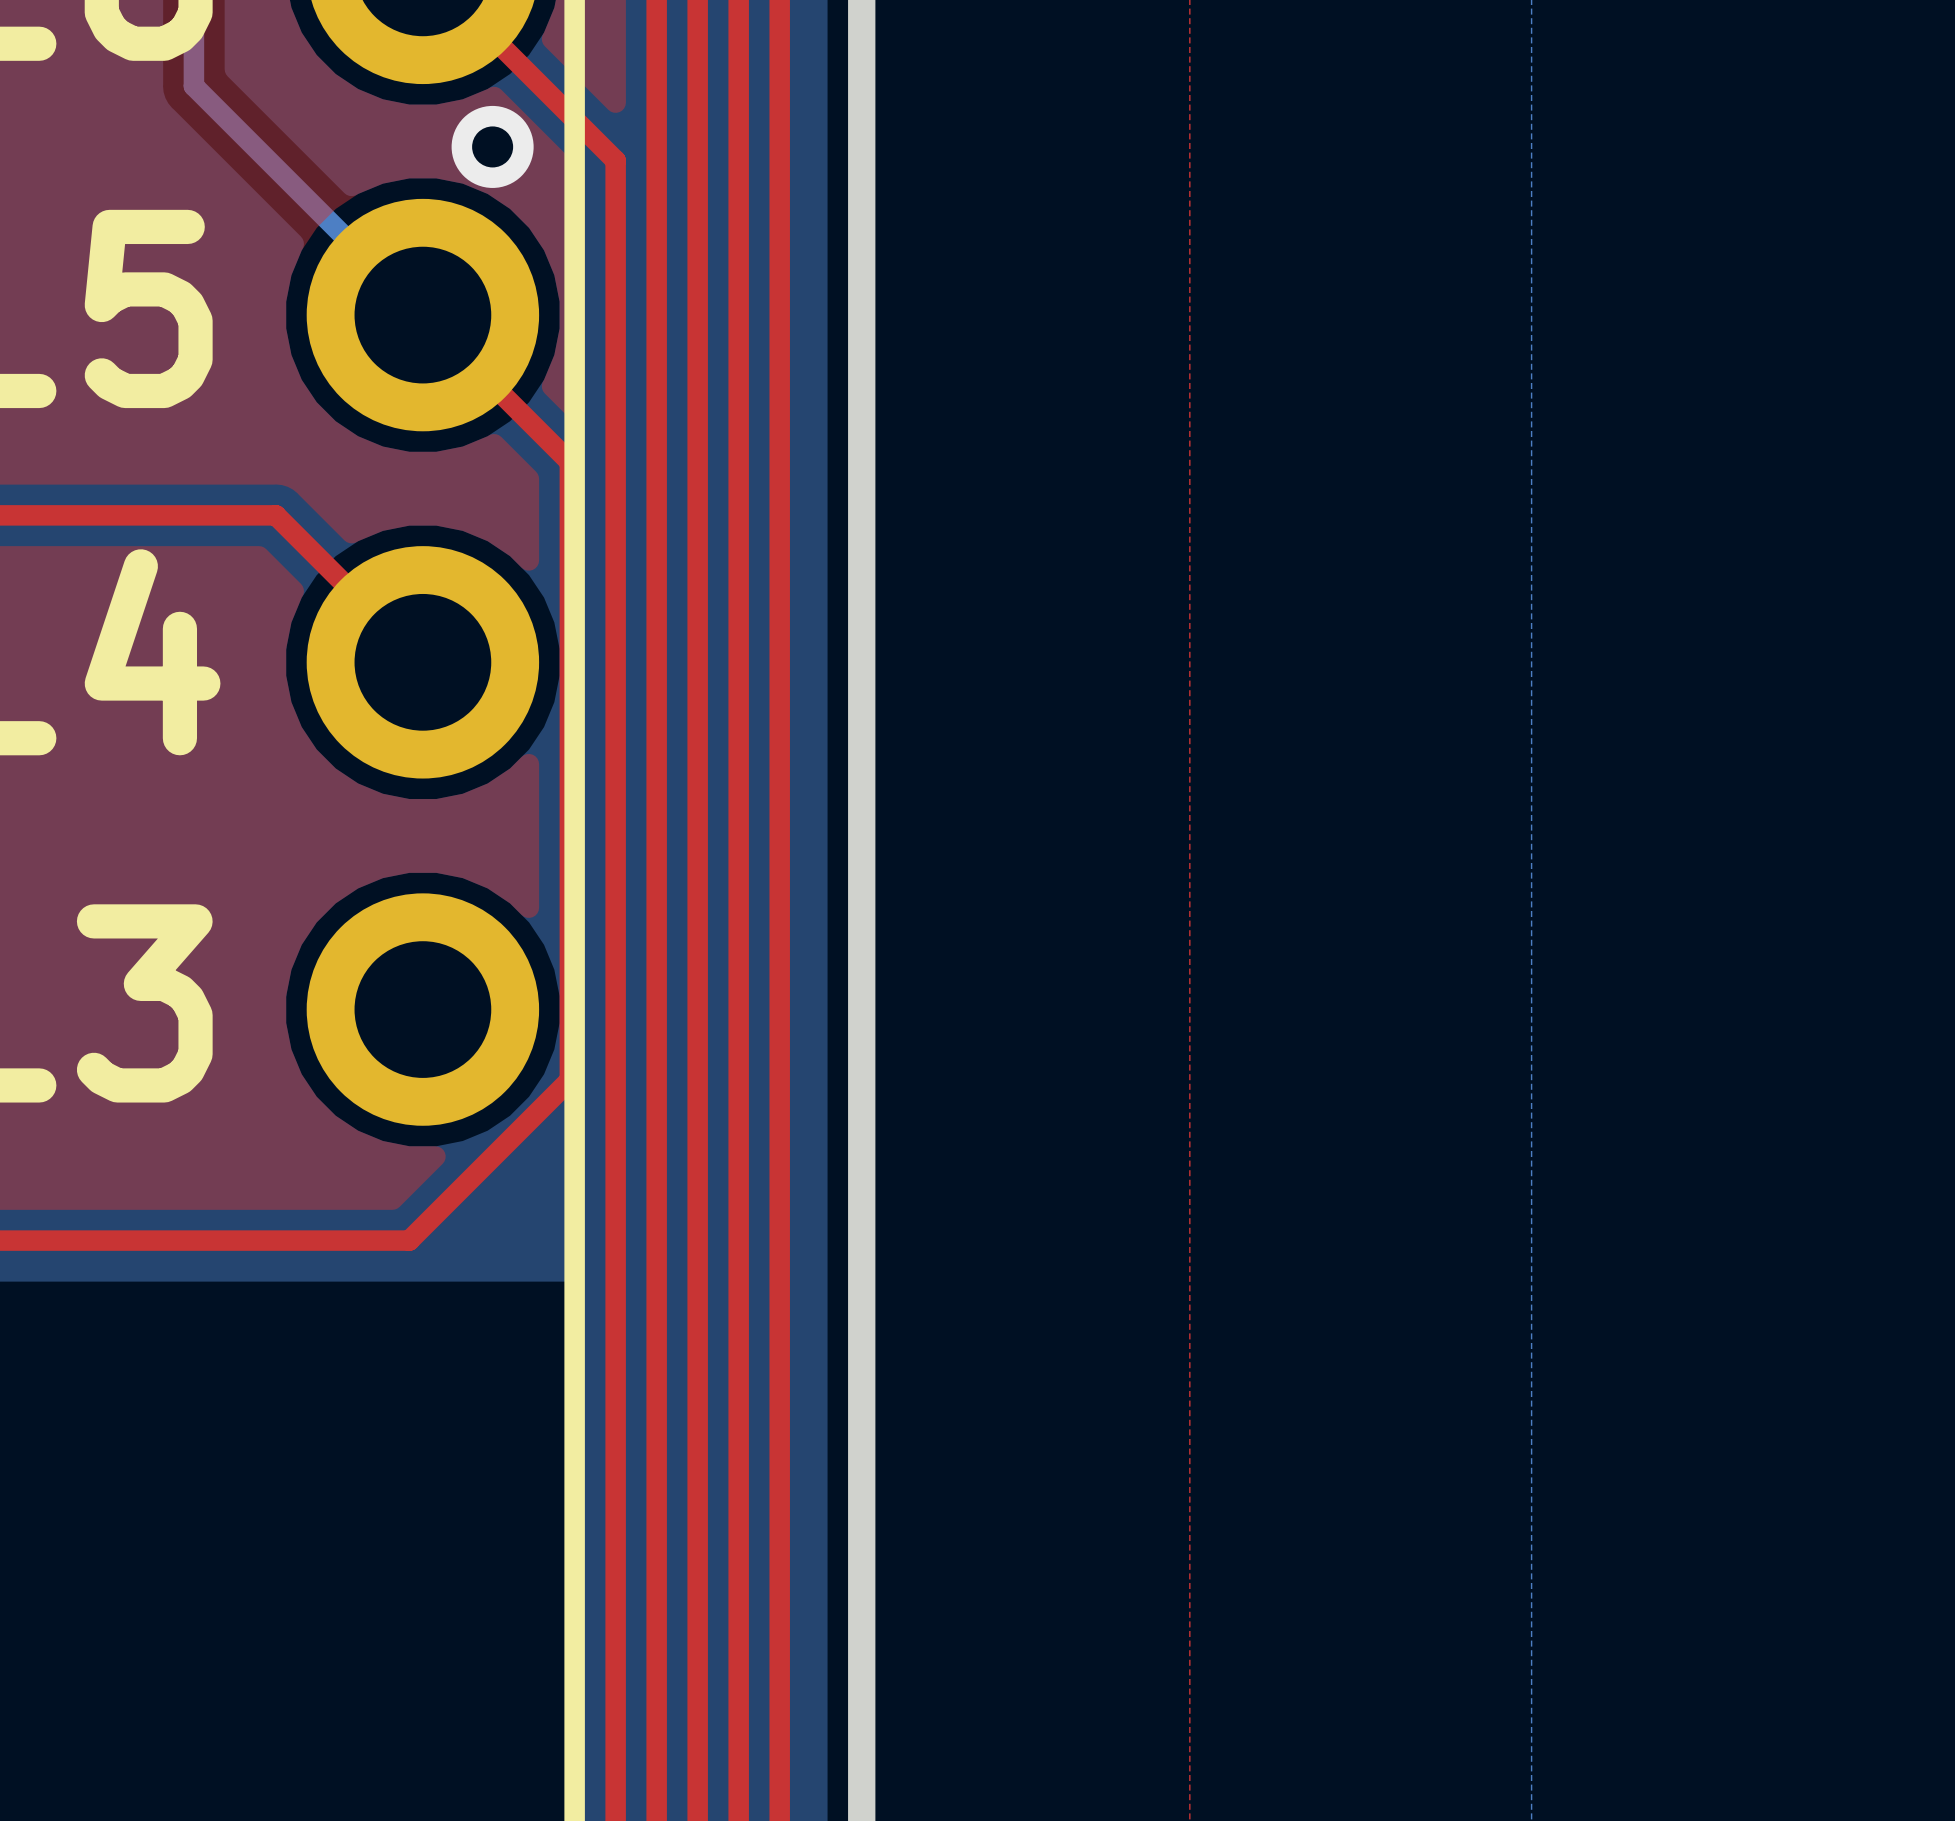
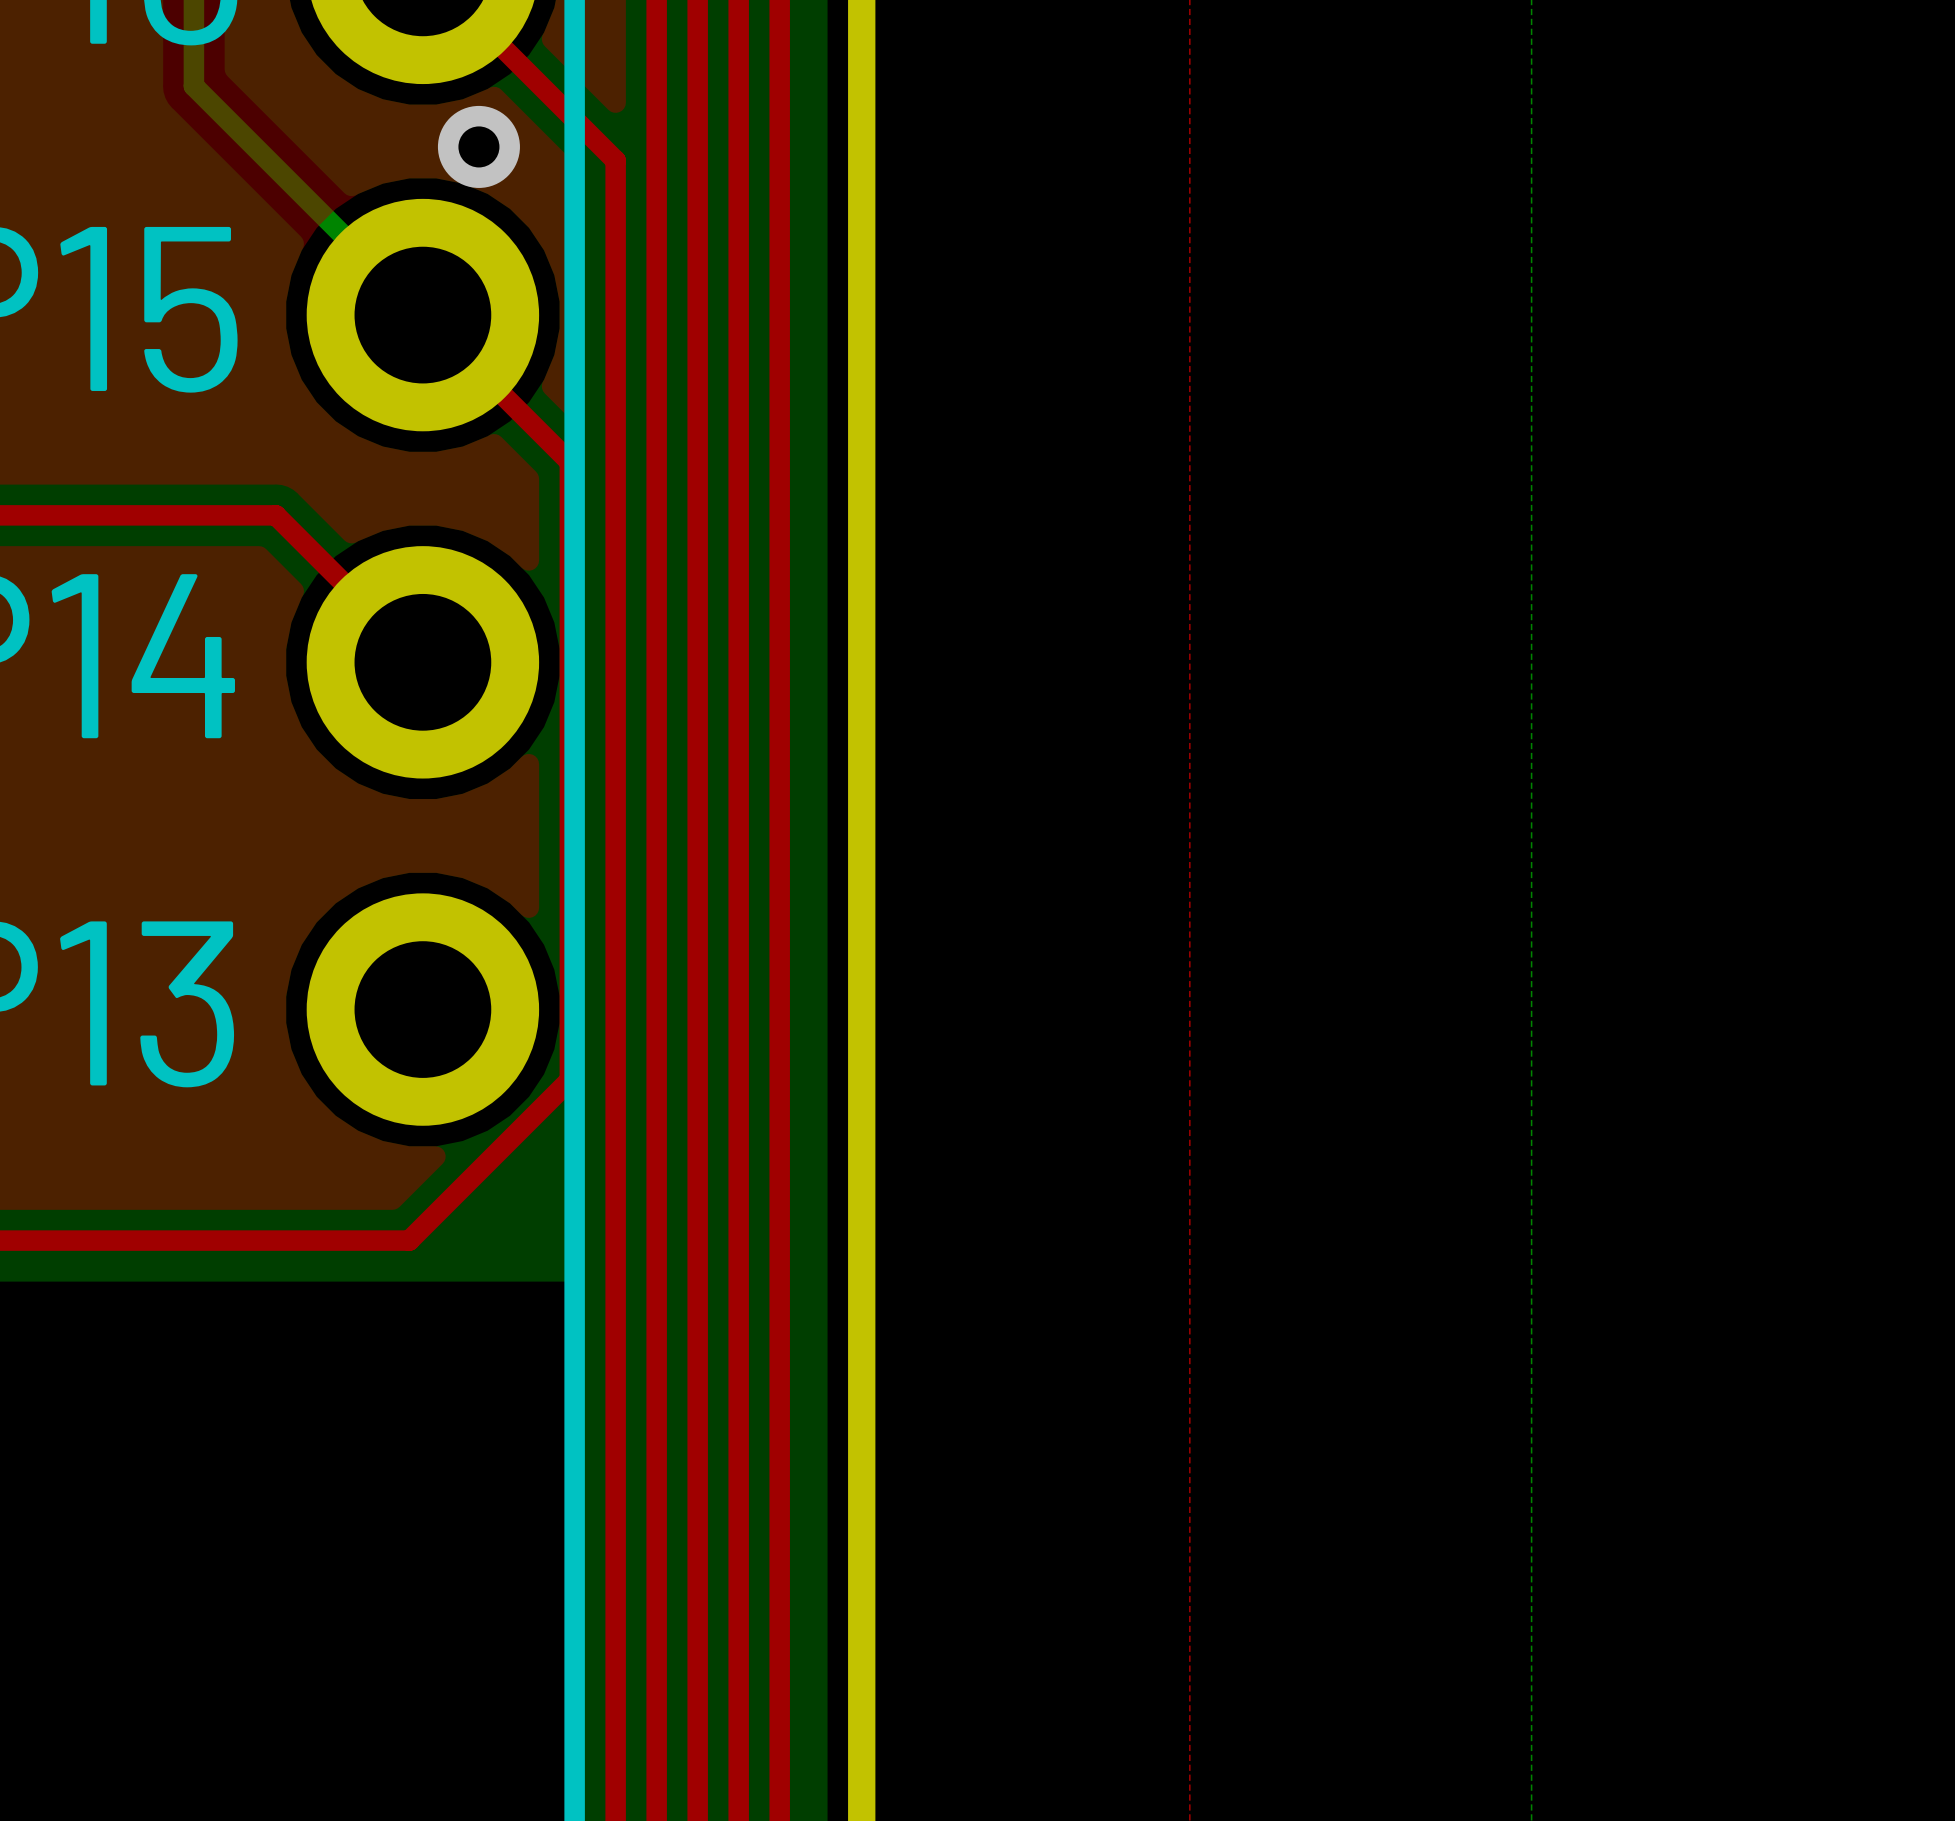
via position: (492, 146) -> (478, 146)

